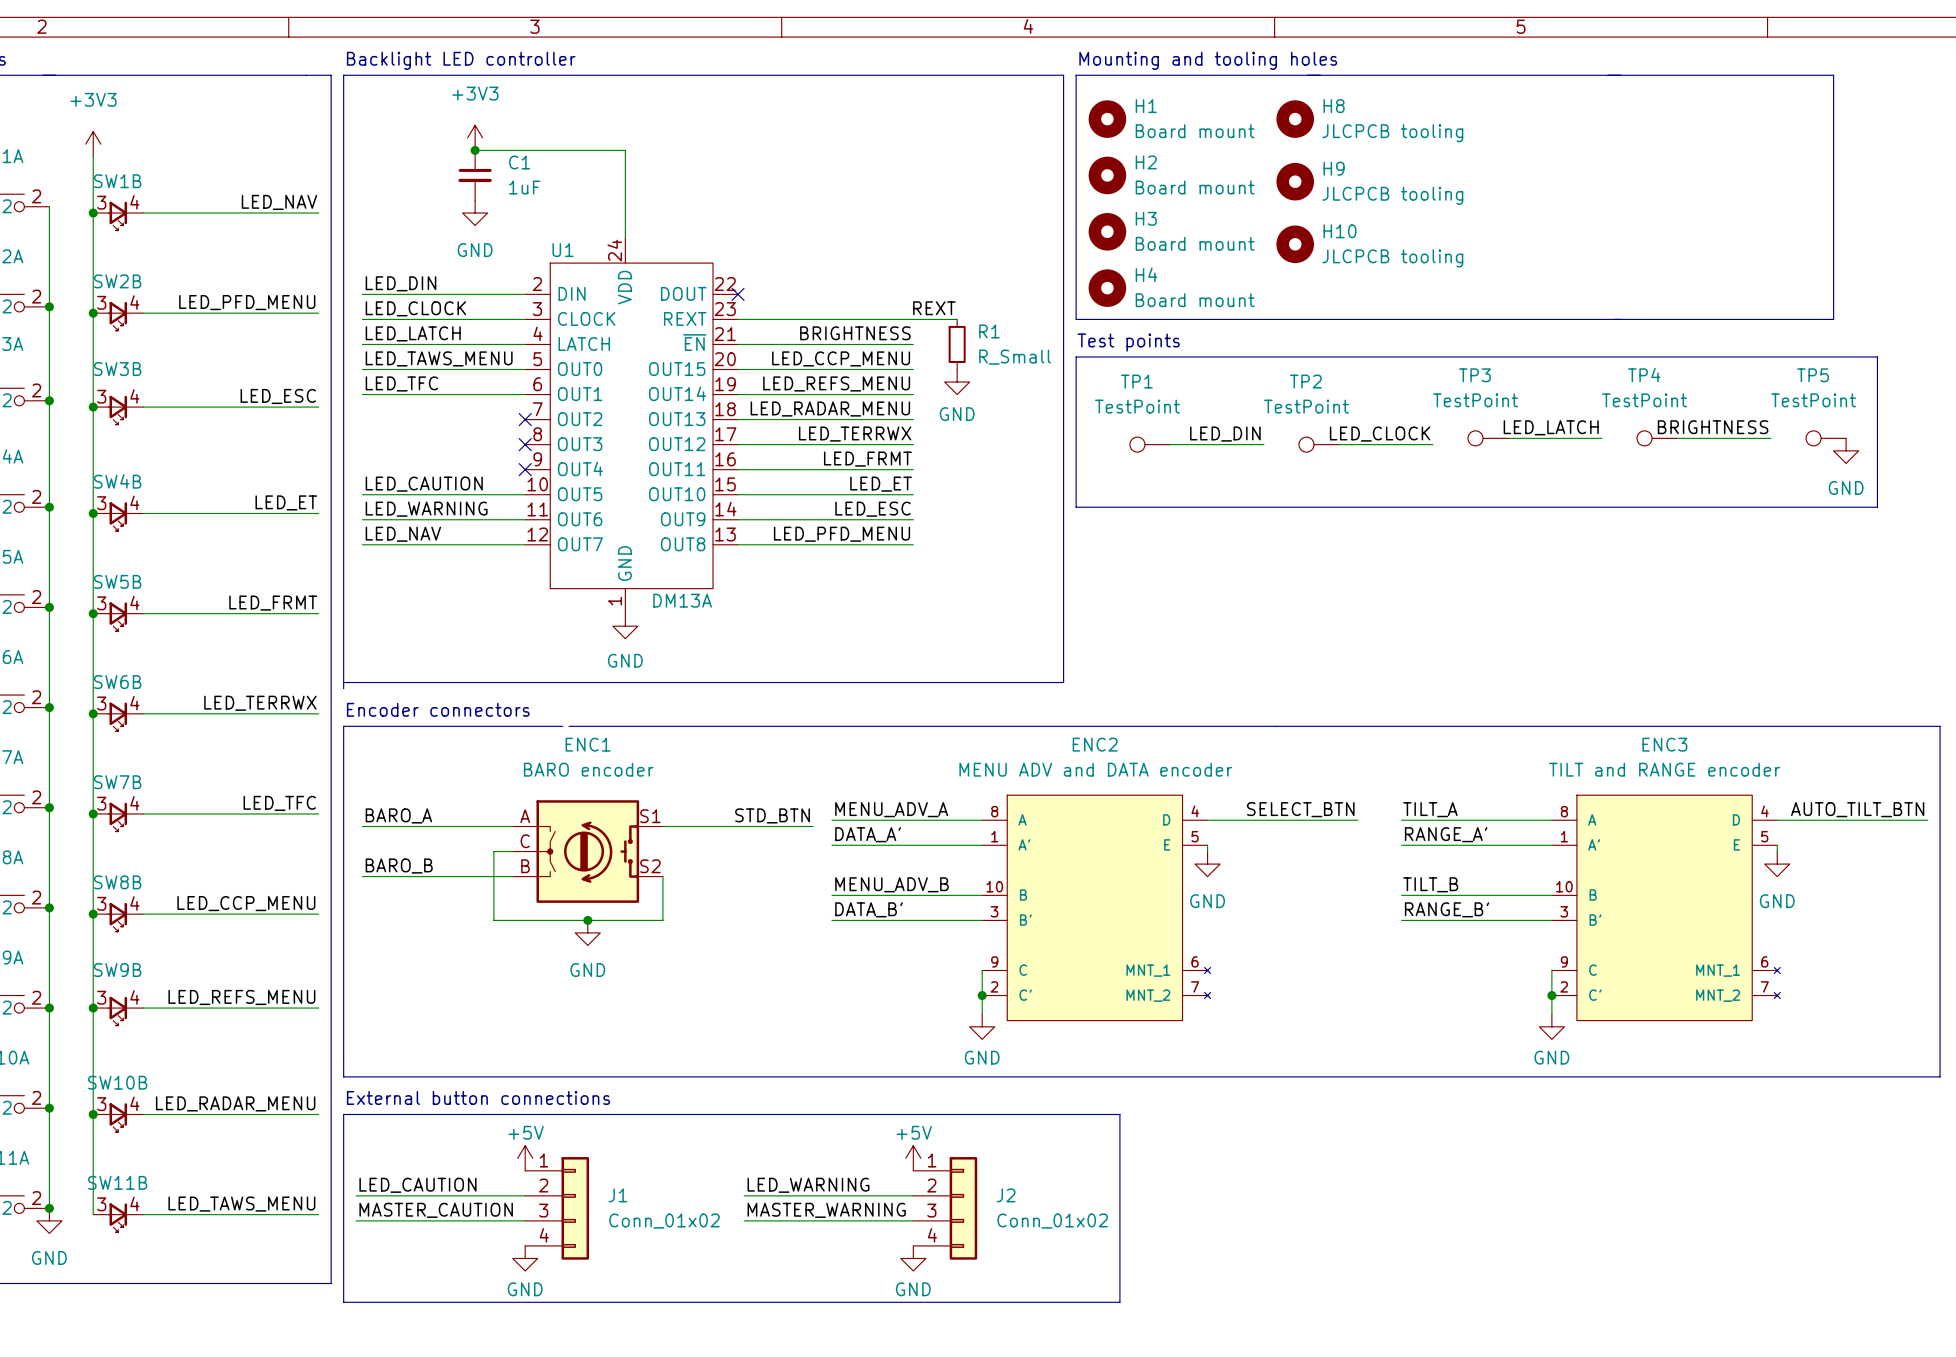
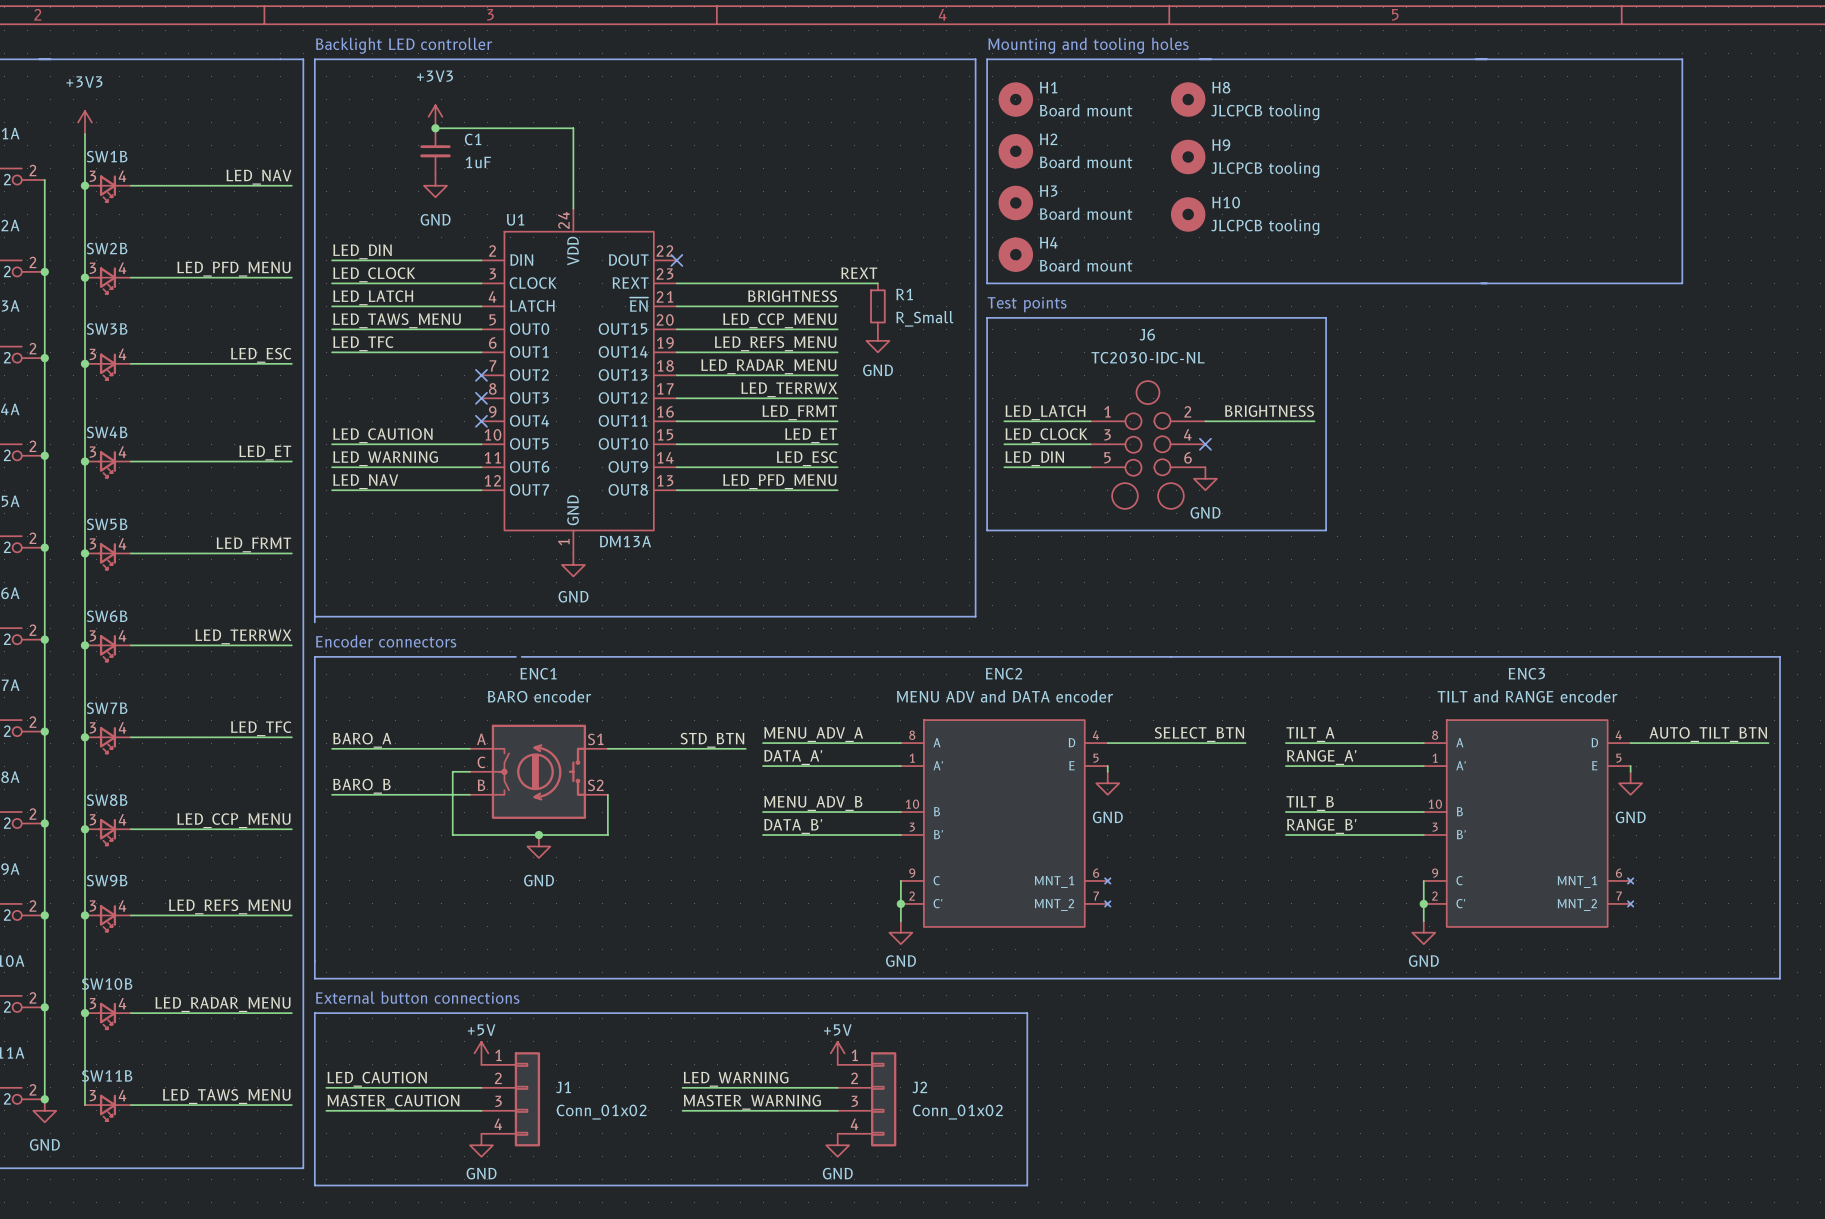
line: (1445, 356) (1877, 356) (1877, 507) (1076, 507) -> (1326, 317) (1326, 530) (987, 530) (987, 455)
label: LED_LATCH (1551, 427) -> none
label: BRIGHTNESS (1713, 427) -> none
label position: LED_DIN (1225, 434) -> LED_DIN (1034, 458)
label: LED_CLOCK (1380, 434) -> none
TP3: TestPoint (1488, 438) -> none
wire: (1508, 438) (1601, 438) -> none
TP4: TestPoint (1657, 438) -> none
wire: (1677, 438) (1771, 438) -> none
TP5: TestPoint (1826, 438) -> none
TP1: TestPoint (1149, 444) -> none
wire: (1170, 444) (1263, 444) -> (1004, 421) (1090, 421)
TP2: TestPoint (1319, 444) -> none
wire: (1339, 444) (1432, 444) -> none
power symbol: GND (1846, 450) -> none
label: none -> BRIGHTNESS (1269, 411)
label: none -> LED_LATCH (1045, 412)
wire: none -> (1205, 421) (1314, 421)
label: none -> LED_CLOCK (1046, 435)
wire: none -> (1004, 444) (1090, 444)
no-connect mark: none -> (1205, 444)
J6: none -> TC2030-IDC-NL (1147, 444)
wire: none -> (1004, 467) (1090, 467)
power symbol: none -> GND (1205, 478)

